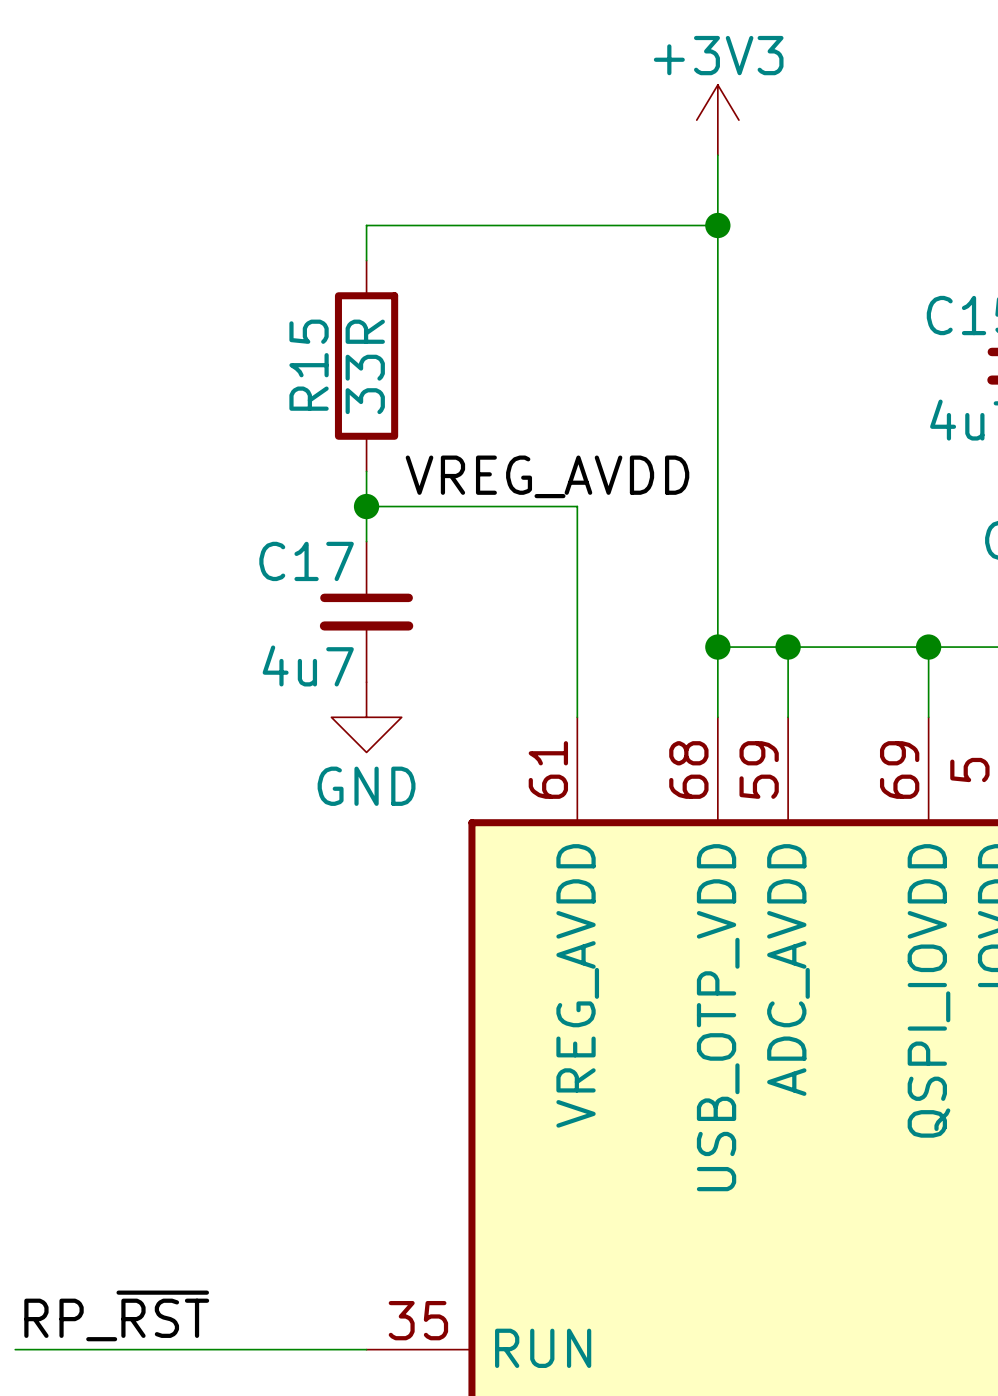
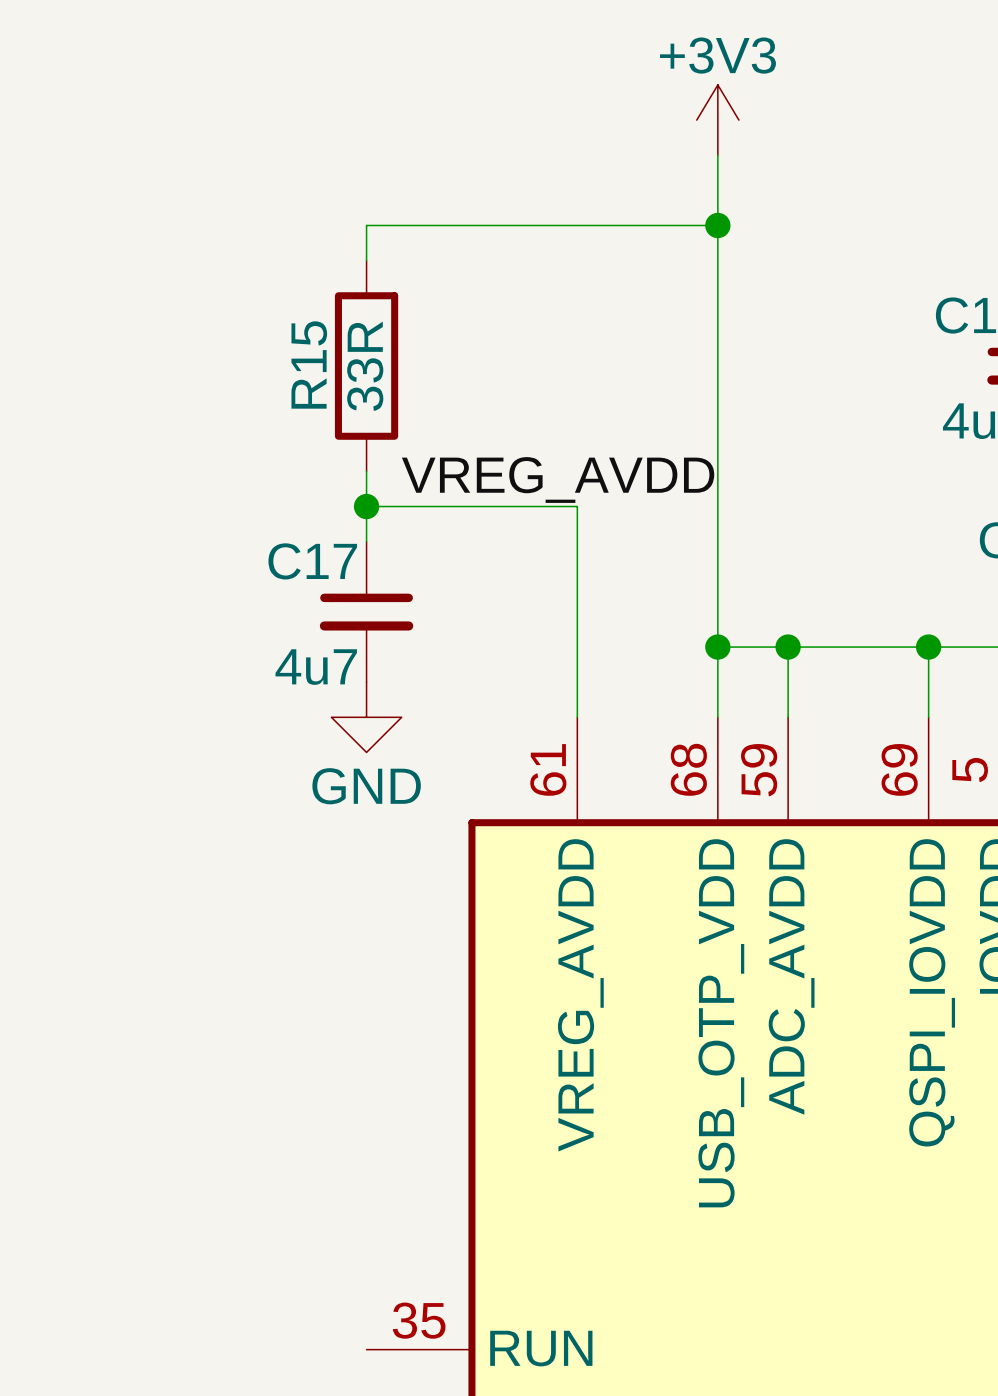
label: RP_~{RST} (116, 1315) -> none
wire: (15, 1349) (366, 1349) -> none

